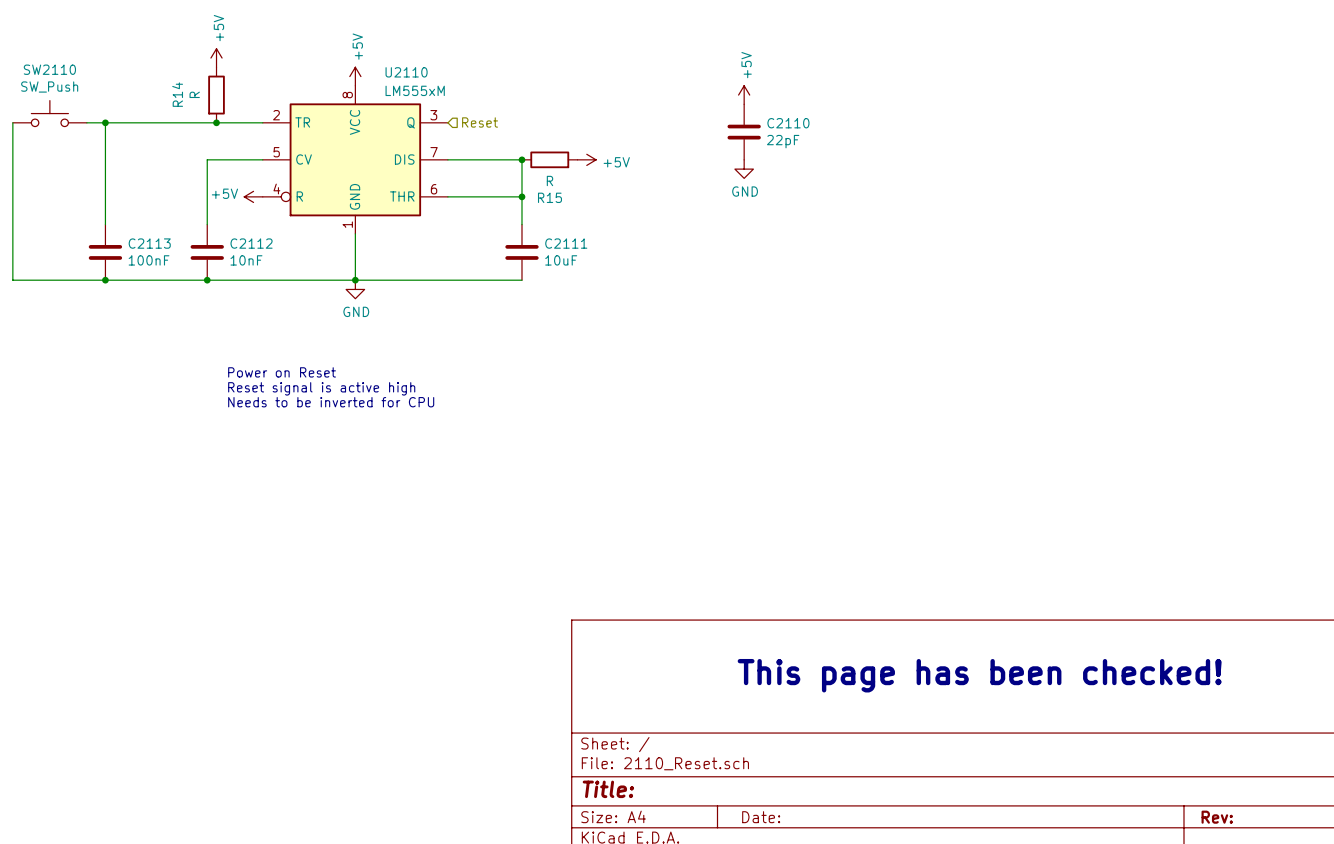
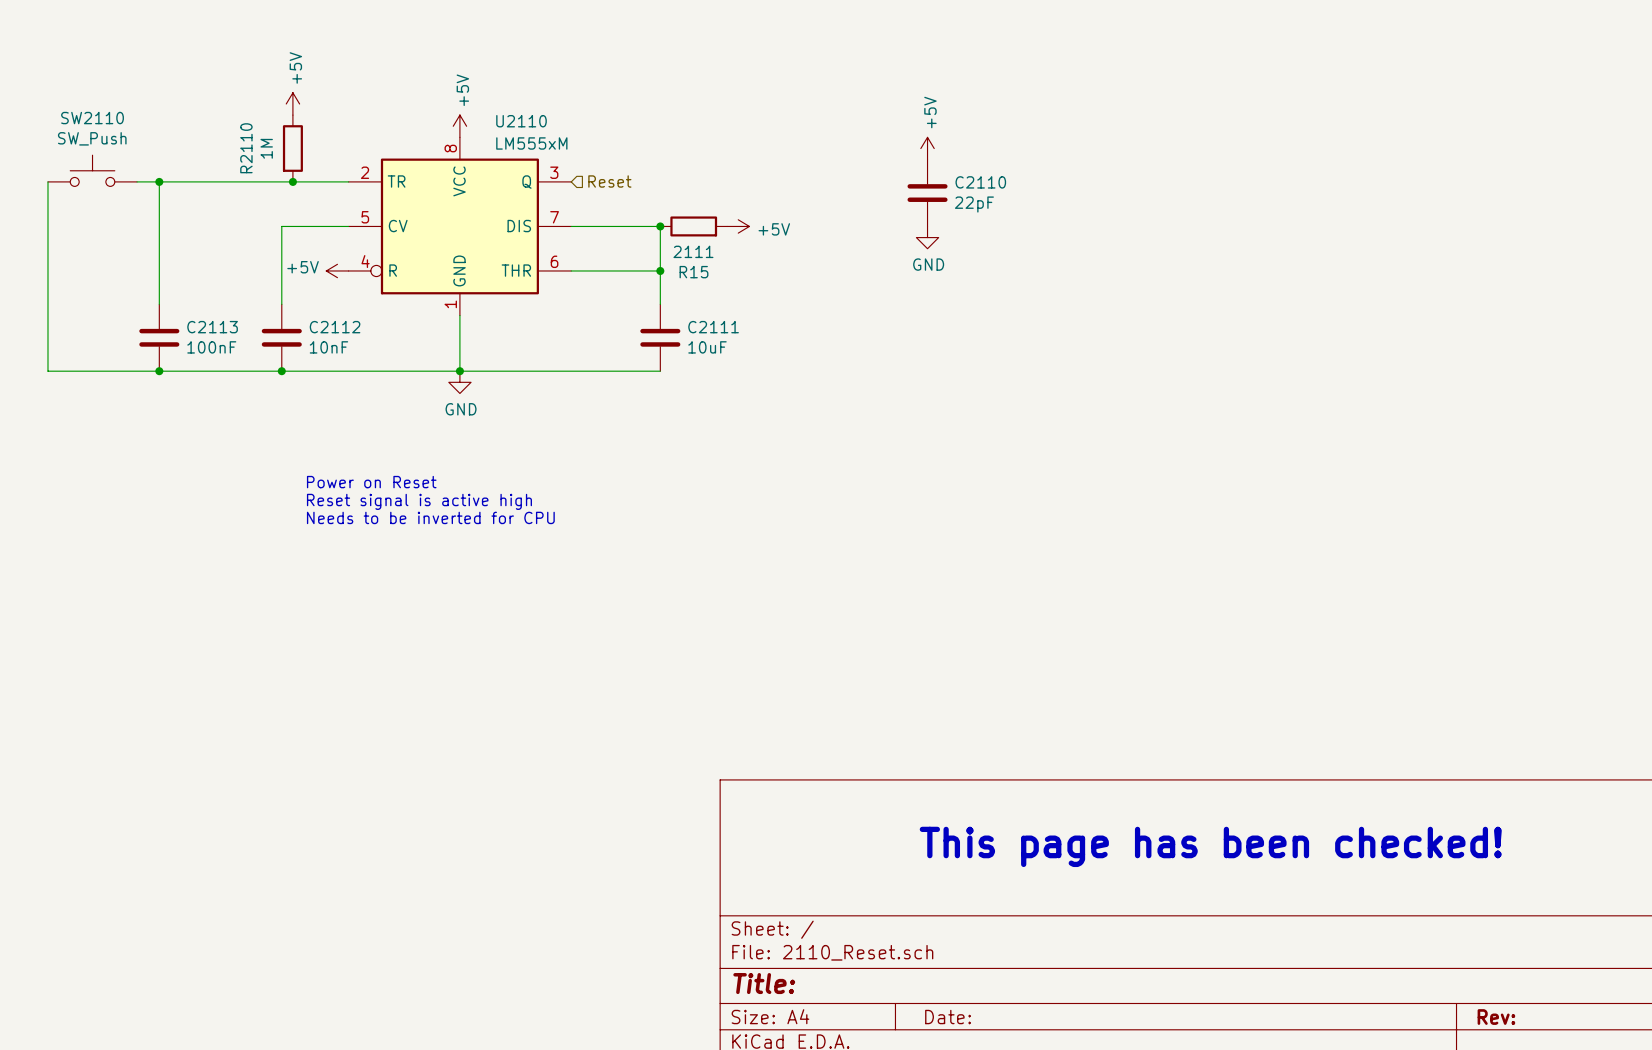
R14 name: R14 (177, 94) -> R2110 (246, 148)
R14 value: R (194, 94) -> 1M (266, 148)
R15 value: R (549, 180) -> 2111 (693, 251)

